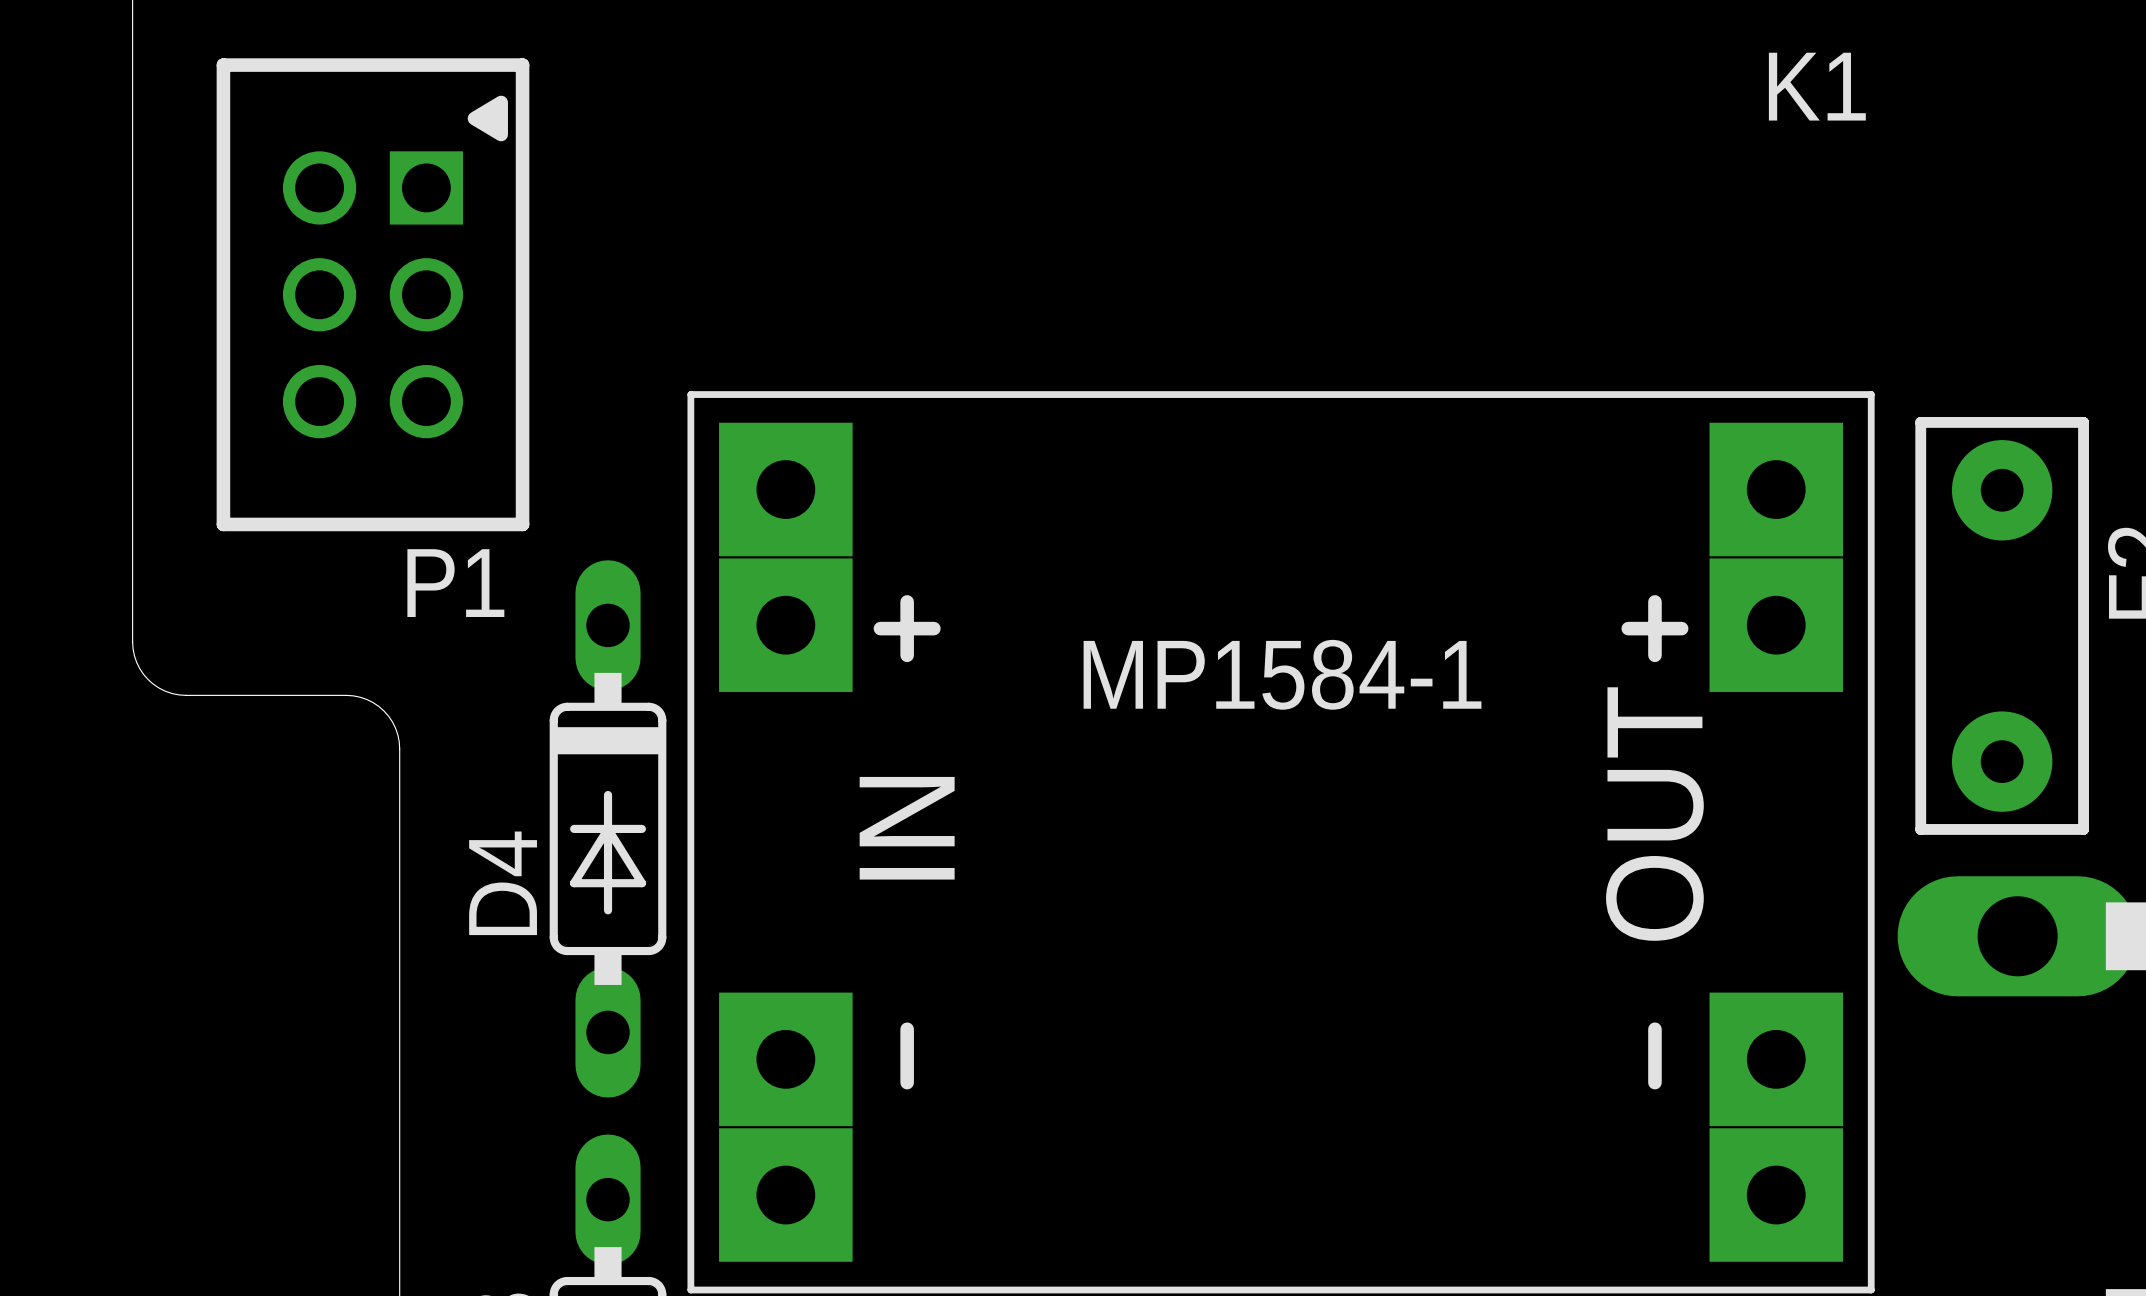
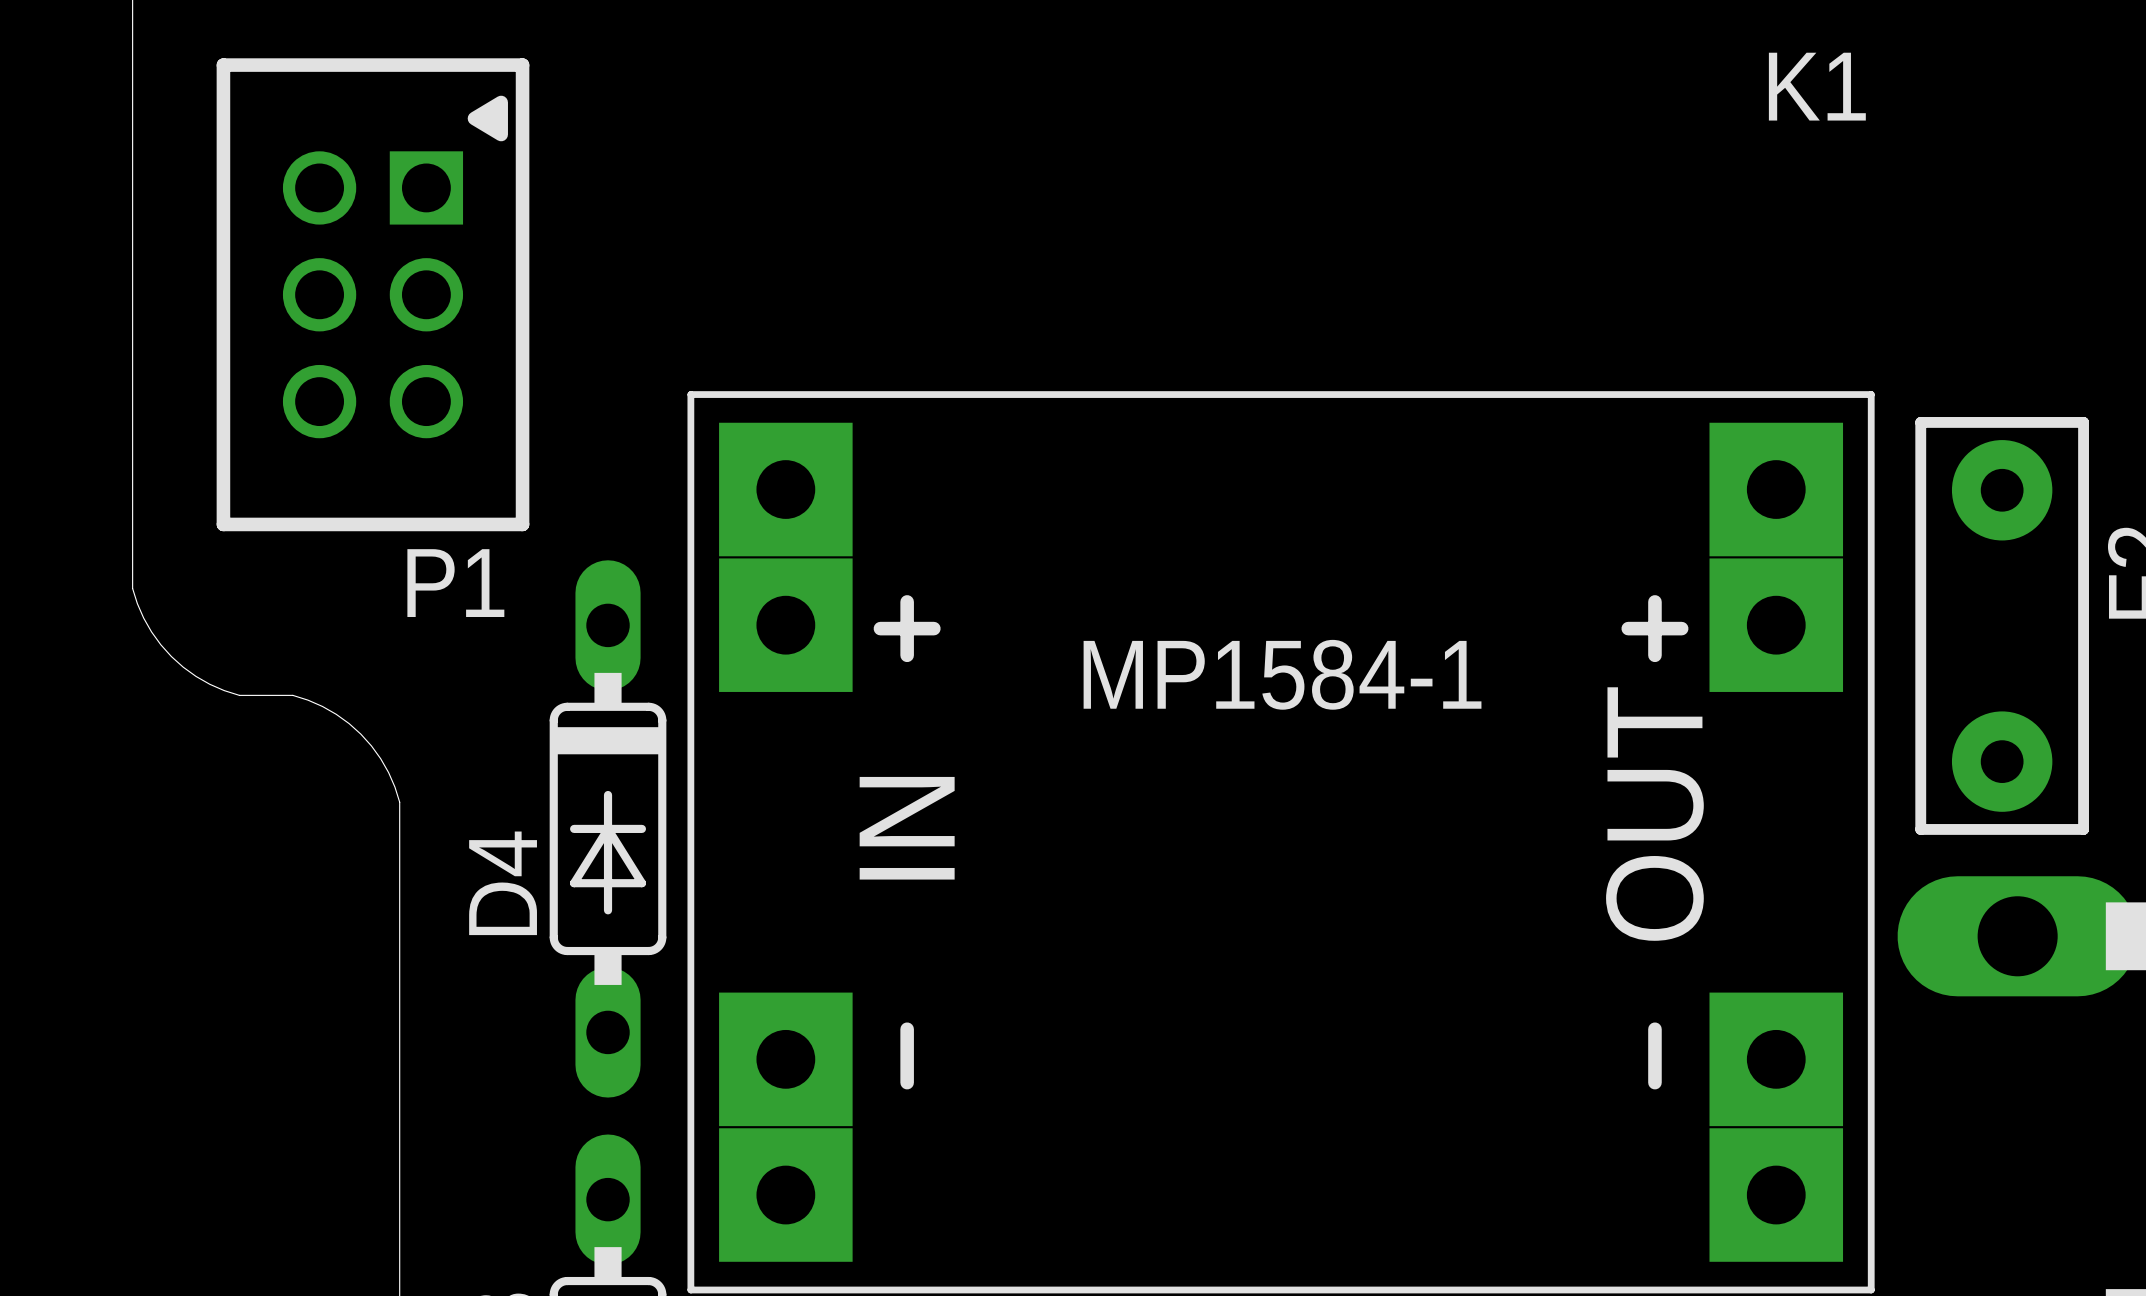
board edge: (132, 588) (133, 648) (136, 662) (148, 679) (165, 691) (179, 694) (239, 695) -> (132, 588) (143, 618) (160, 644) (171, 656) (183, 667) (209, 684) (239, 695)
board edge: (292, 695) (353, 695) (366, 699) (384, 711) (395, 728) (399, 741) (399, 802) -> (292, 695) (322, 706) (349, 723) (360, 734) (371, 745) (388, 772) (399, 802)

